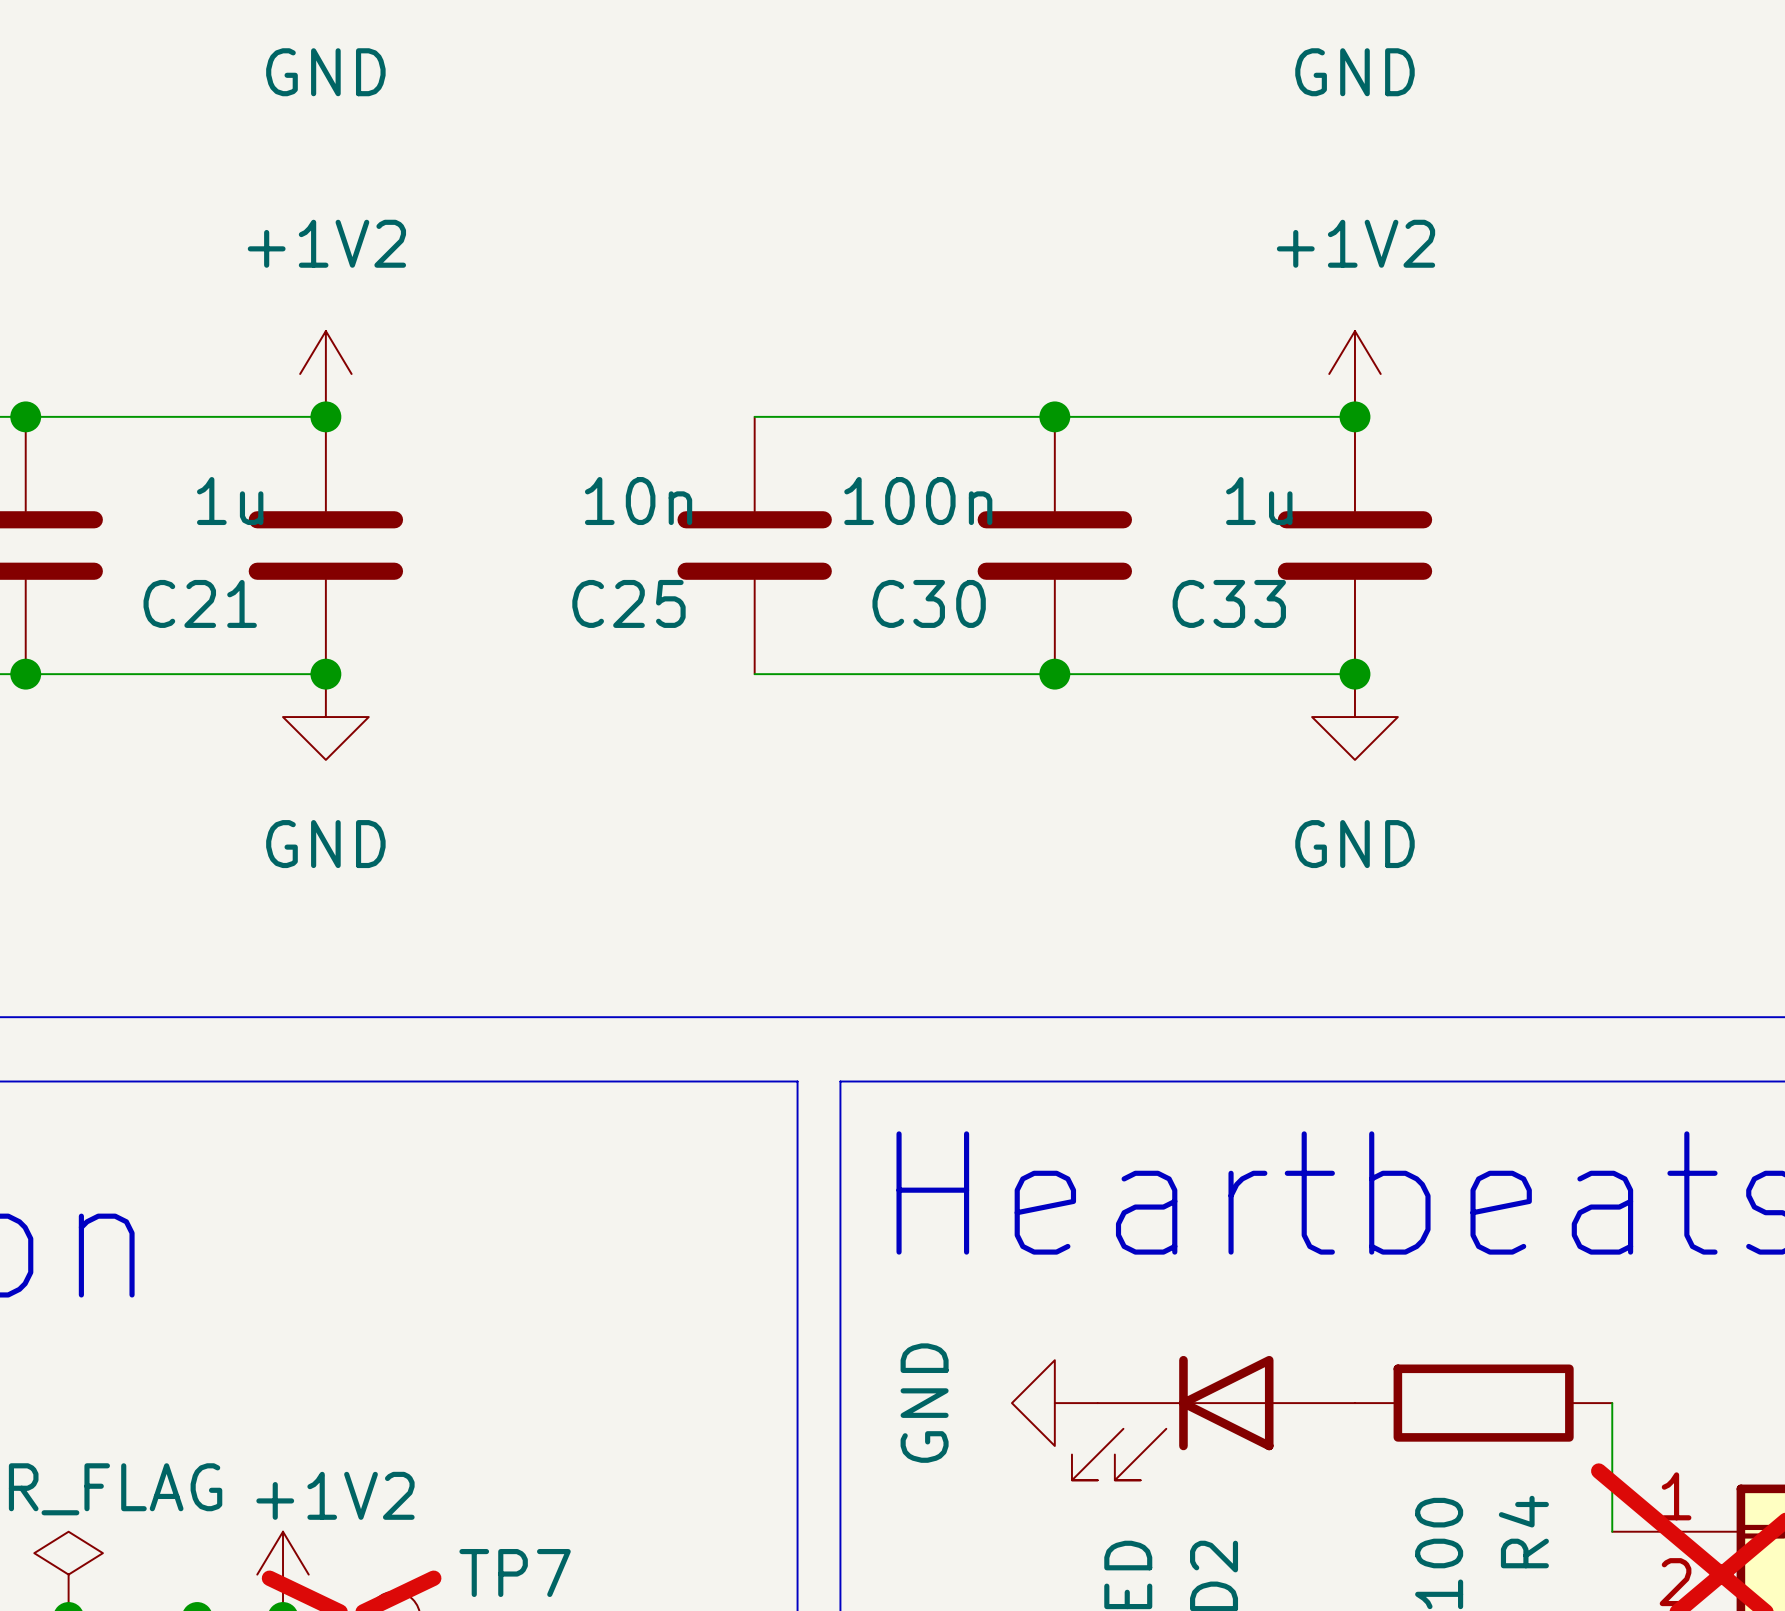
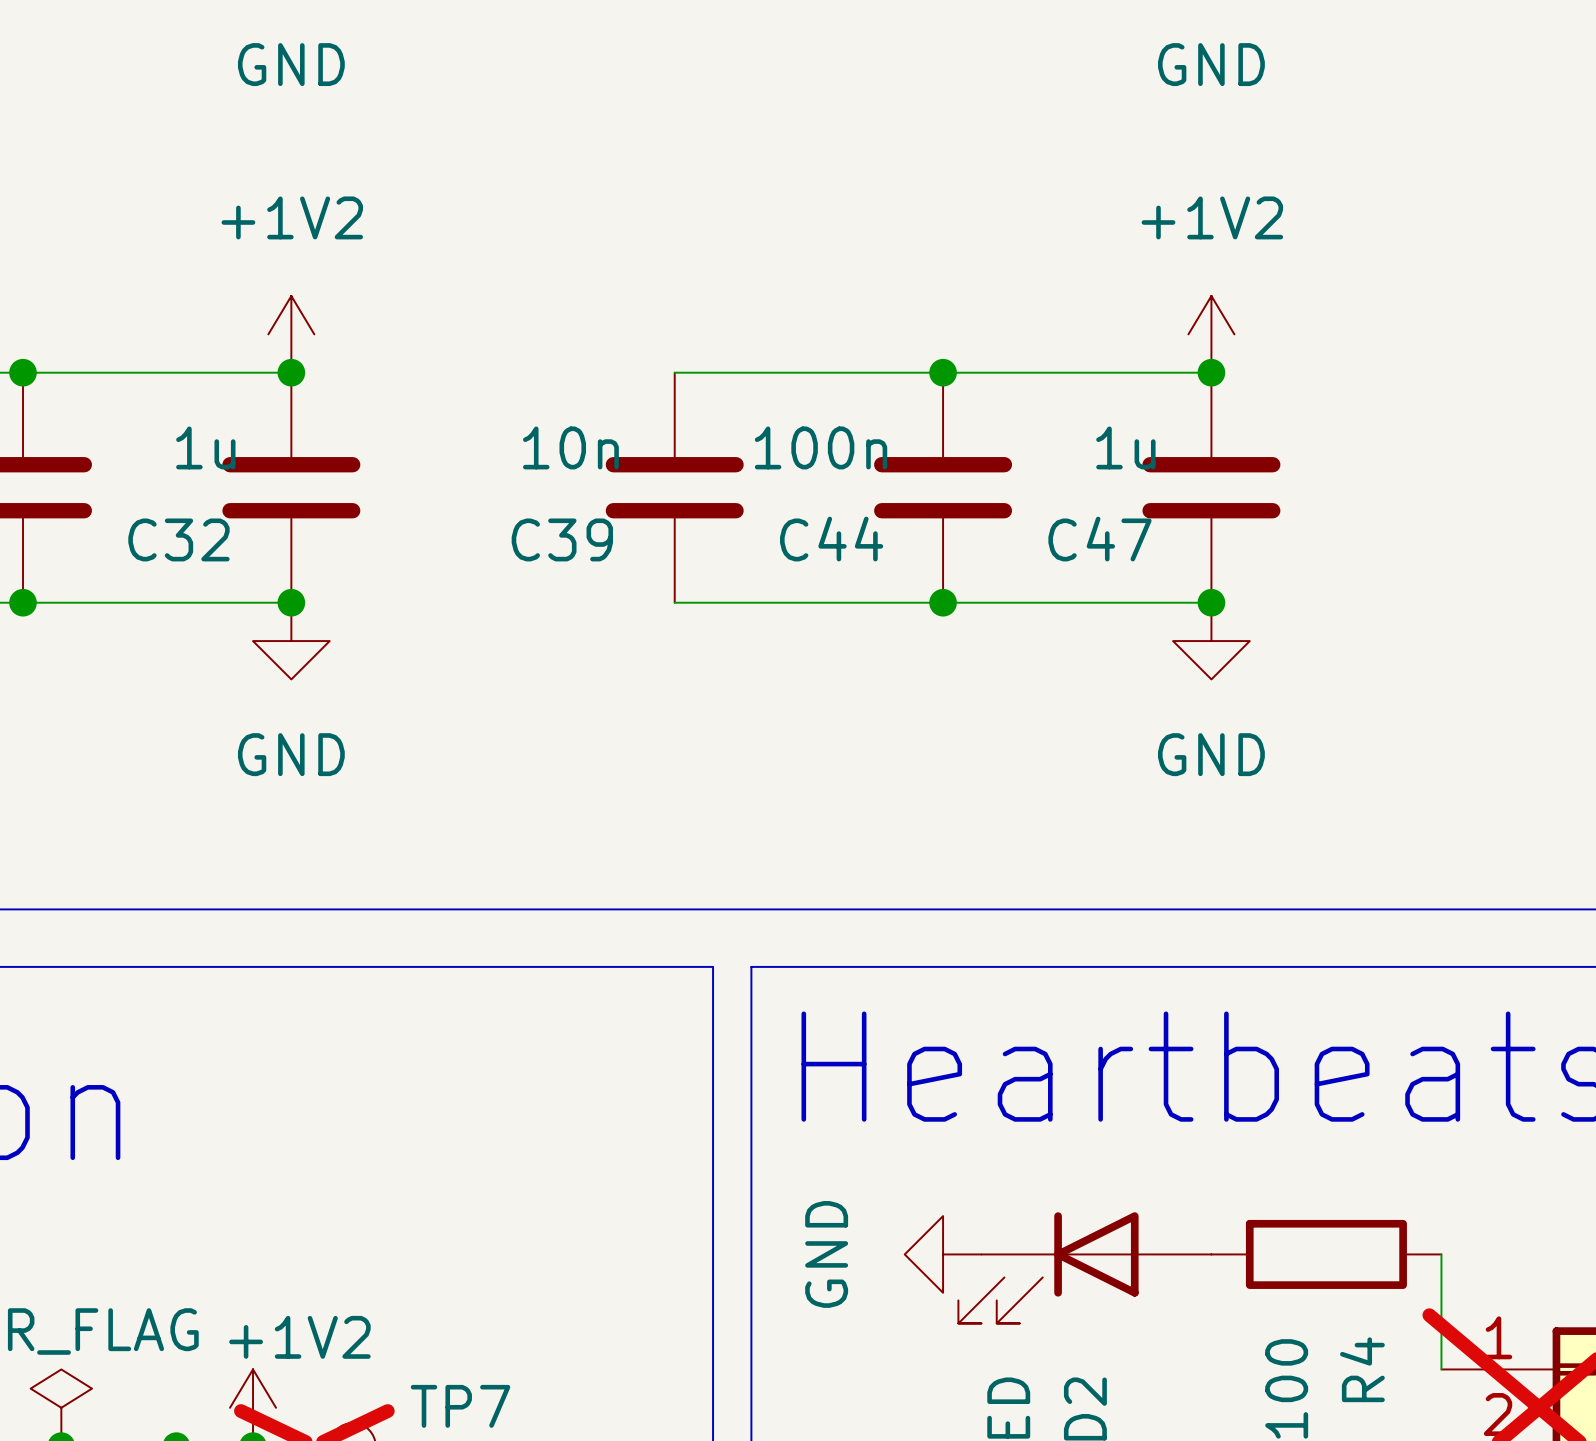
C21 name: C21 (200, 603) -> C32 (178, 539)
C25 name: C25 (628, 603) -> C39 (562, 539)
C30 name: C30 (929, 603) -> C44 (831, 539)
C33 name: C33 (1229, 603) -> C47 (1099, 539)

